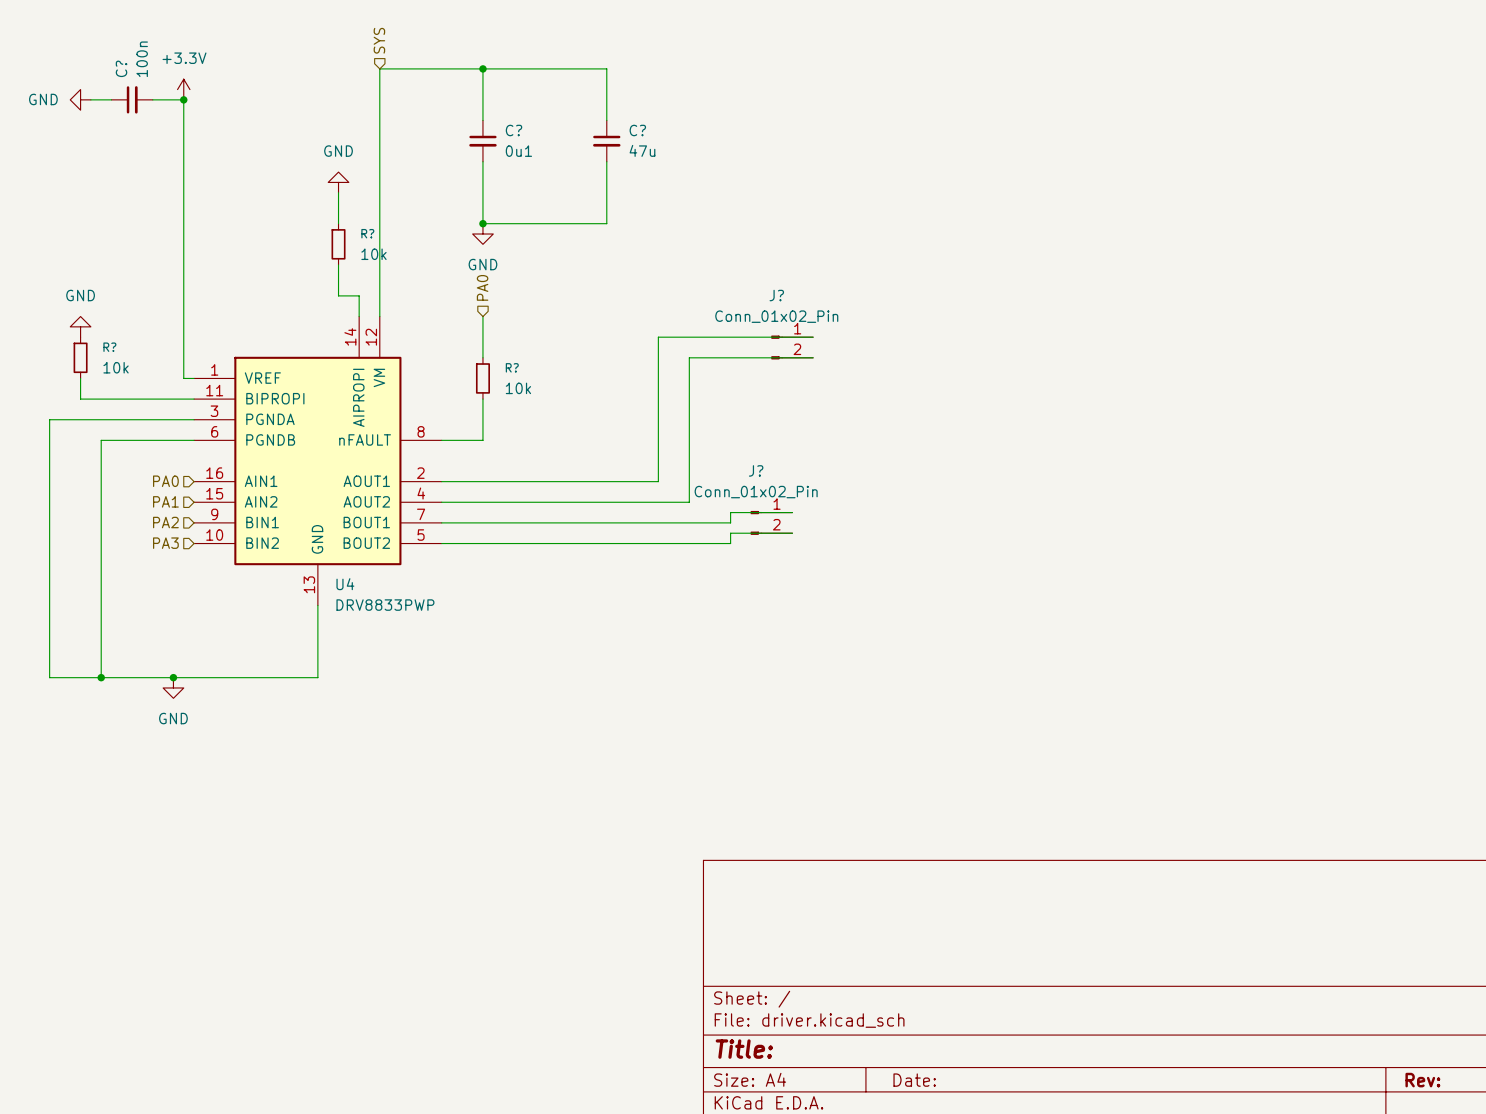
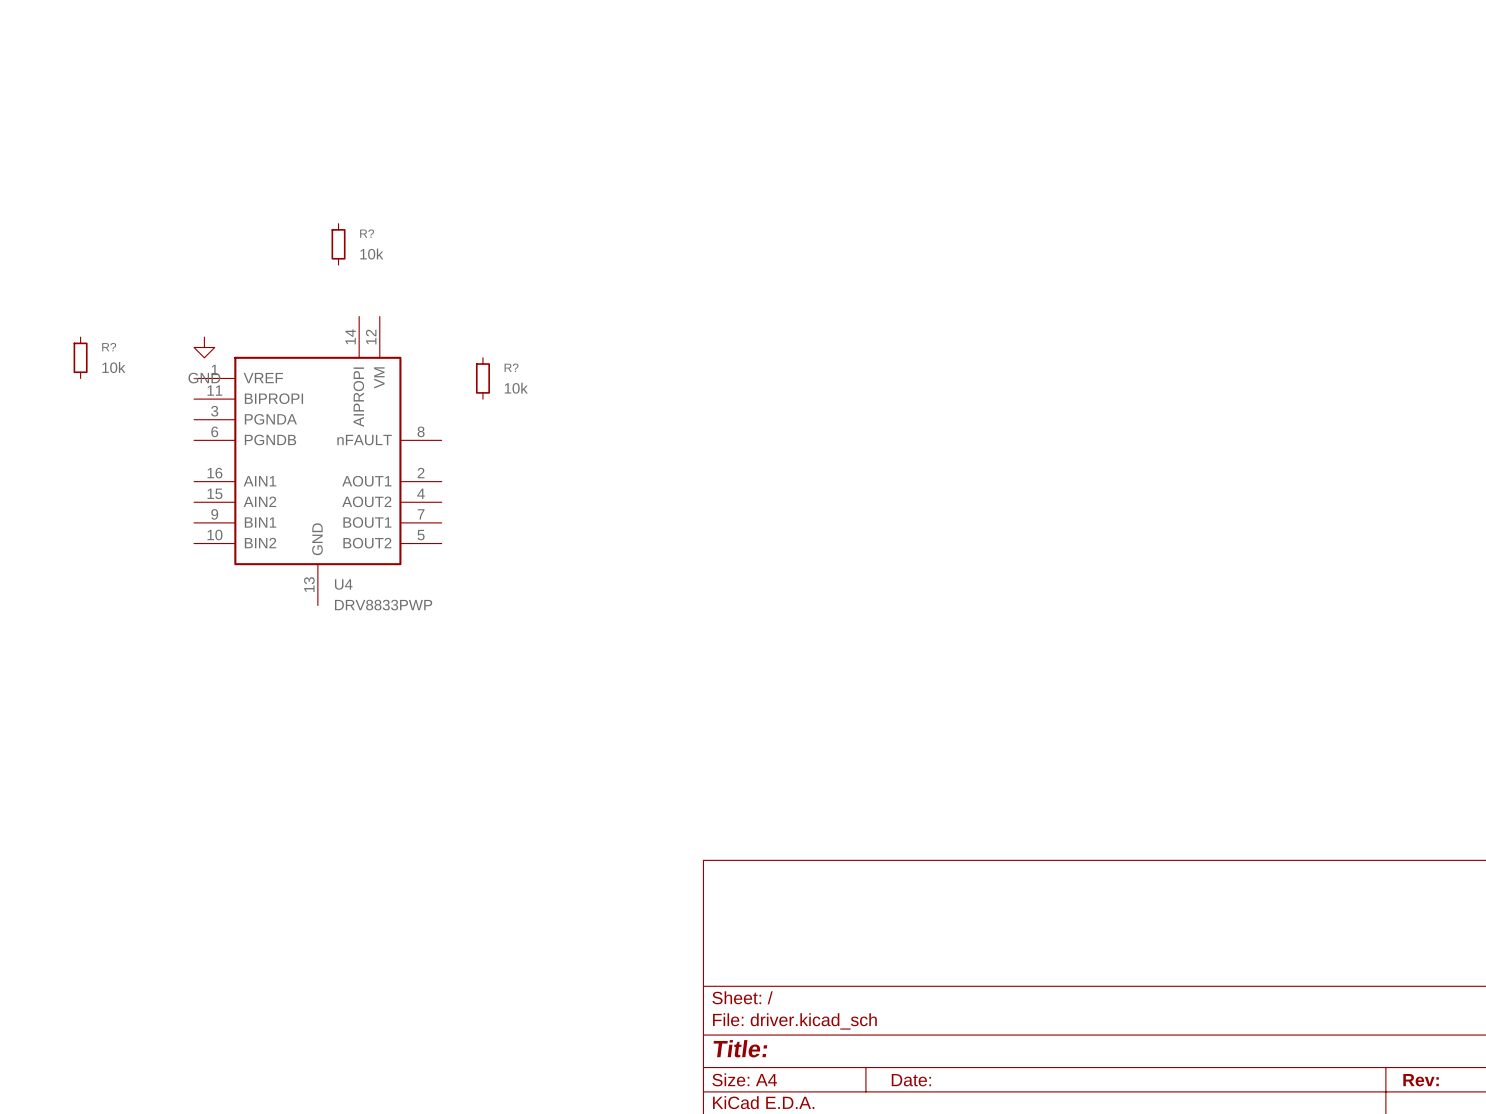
hierarchical label: SYS (379, 40) -> none
wire: (482, 68) (482, 120) -> none
junction: (482, 68) -> none
power symbol: +3.3V (183, 89) -> none
power symbol: GND (80, 99) -> none
wire: (90, 99) (111, 99) -> none
C?: 100n (132, 99) -> none
wire: (152, 99) (183, 99) (183, 378) (194, 378) -> none
junction: (183, 99) -> none
wire: (606, 120) (606, 68) (379, 68) (379, 316) -> none
C?: 0u1 (482, 141) -> none
C?: 47u (606, 141) -> none
wire: (482, 161) (482, 223) (606, 223) (606, 161) -> none
power symbol: GND (338, 182) -> none
wire: (338, 192) (338, 223) -> none
junction: (482, 223) -> none
power symbol: GND (482, 234) -> none
wire: (338, 264) (338, 295) (359, 295) (359, 316) -> none
hierarchical label: PA0 (482, 287) -> none
wire: (482, 316) (482, 357) -> none
power symbol: GND (80, 326) -> none
wire: (813, 337) (658, 337) (658, 481) (441, 481) -> none
power symbol: none -> GND (204, 347)
J?: Conn_01x02_Pin (792, 347) -> none
wire: (813, 357) (689, 357) (689, 502) (441, 502) -> none
wire: (80, 378) (80, 399) (194, 399) -> none
wire: (482, 399) (482, 440) (441, 440) -> none
wire: (194, 419) (49, 419) (49, 677) (317, 677) (317, 605) -> none
wire: (194, 440) (101, 440) (101, 677) -> none
hierarchical label: PA0 (165, 481) -> none
hierarchical label: PA1 (165, 501) -> none
wire: (792, 512) (730, 512) (730, 522) (441, 522) -> none
hierarchical label: PA2 (165, 522) -> none
J?: Conn_01x02_Pin (771, 522) -> none
wire: (792, 533) (730, 533) (730, 543) (441, 543) -> none
hierarchical label: PA3 (165, 543) -> none
junction: (101, 677) -> none
junction: (173, 677) -> none
power symbol: GND (173, 687) -> none

